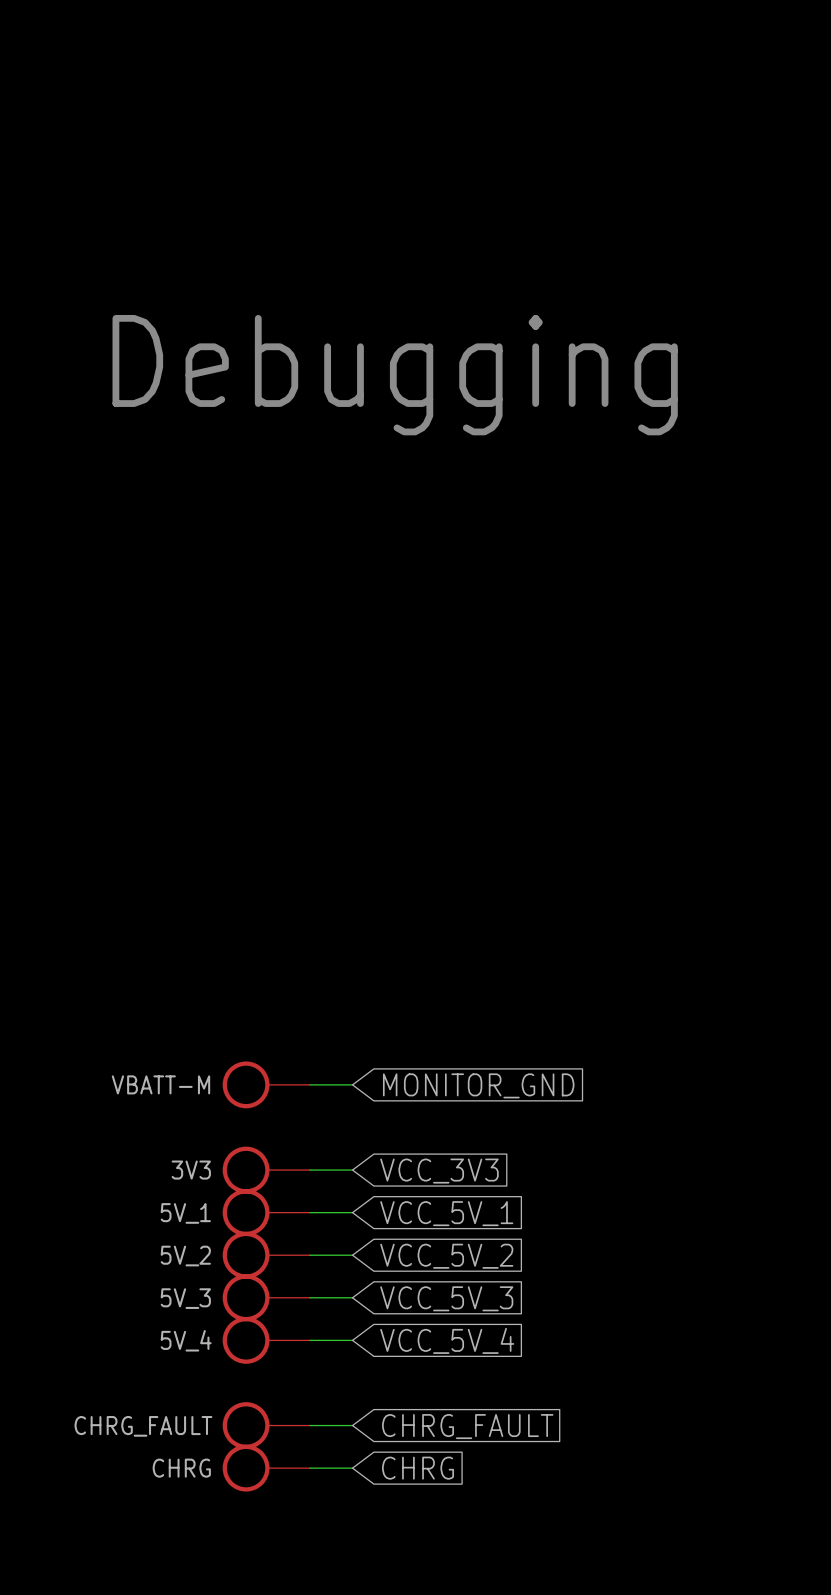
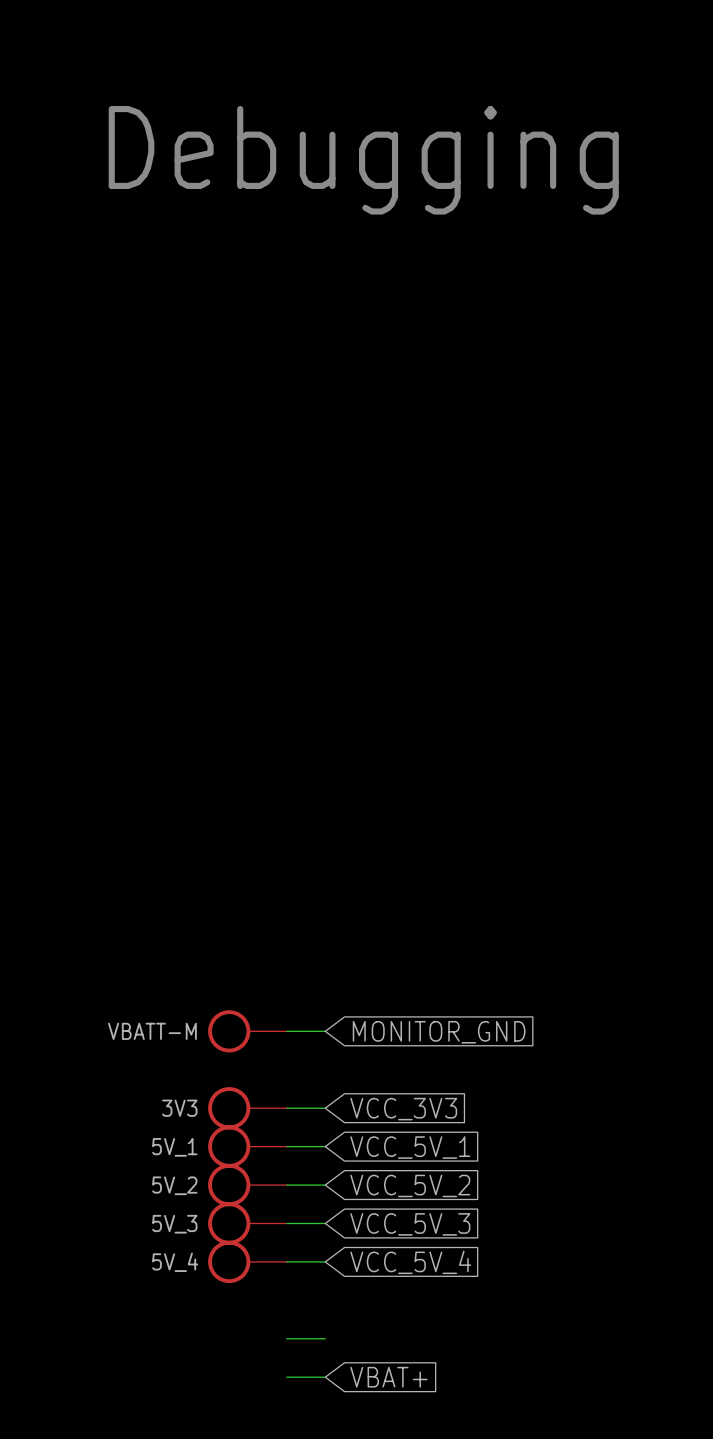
text position: Debugging (395, 375) -> Debugging (363, 160)
CHRG_FAULT: (266, 1425) -> none
global label: CHRG_FAULT (467, 1426) -> none
CHRG: (266, 1468) -> none
global label: CHRG (418, 1468) -> VBAT+ (388, 1377)

